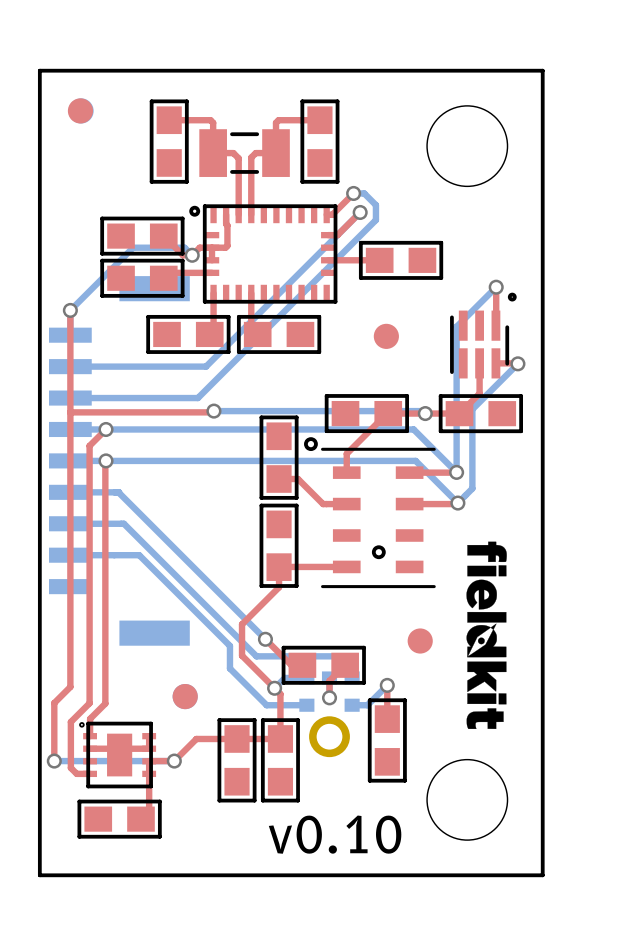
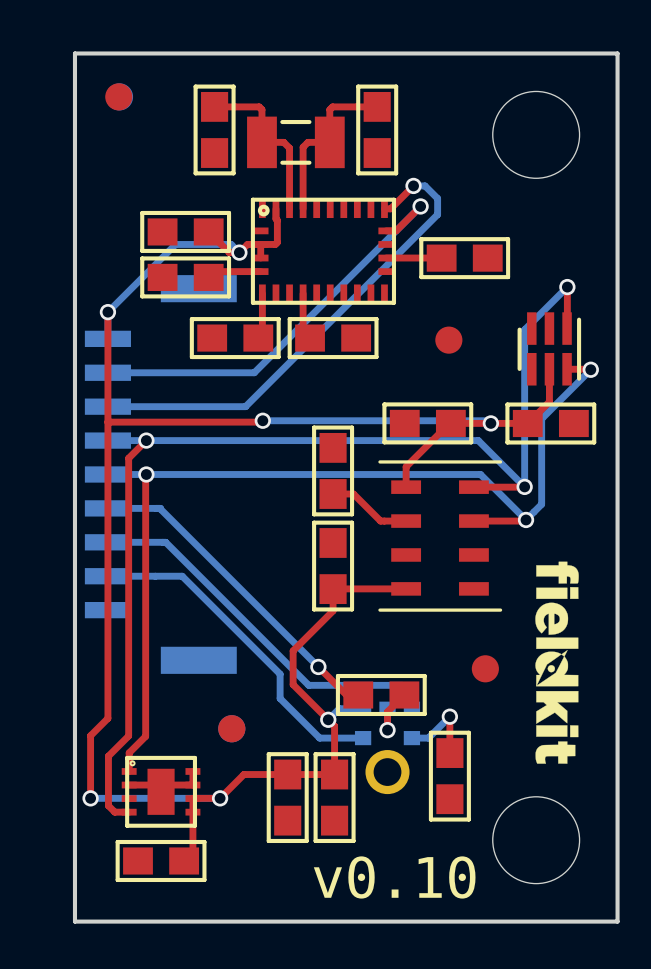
part footprint: [189, 204, 338, 304] -> [250, 197, 397, 305]
part footprint: [450, 292, 517, 379] -> [517, 312, 582, 386]
part footprint: [304, 437, 436, 589] -> [378, 460, 503, 612]
part footprint: [79, 721, 157, 789] -> [121, 755, 201, 828]

